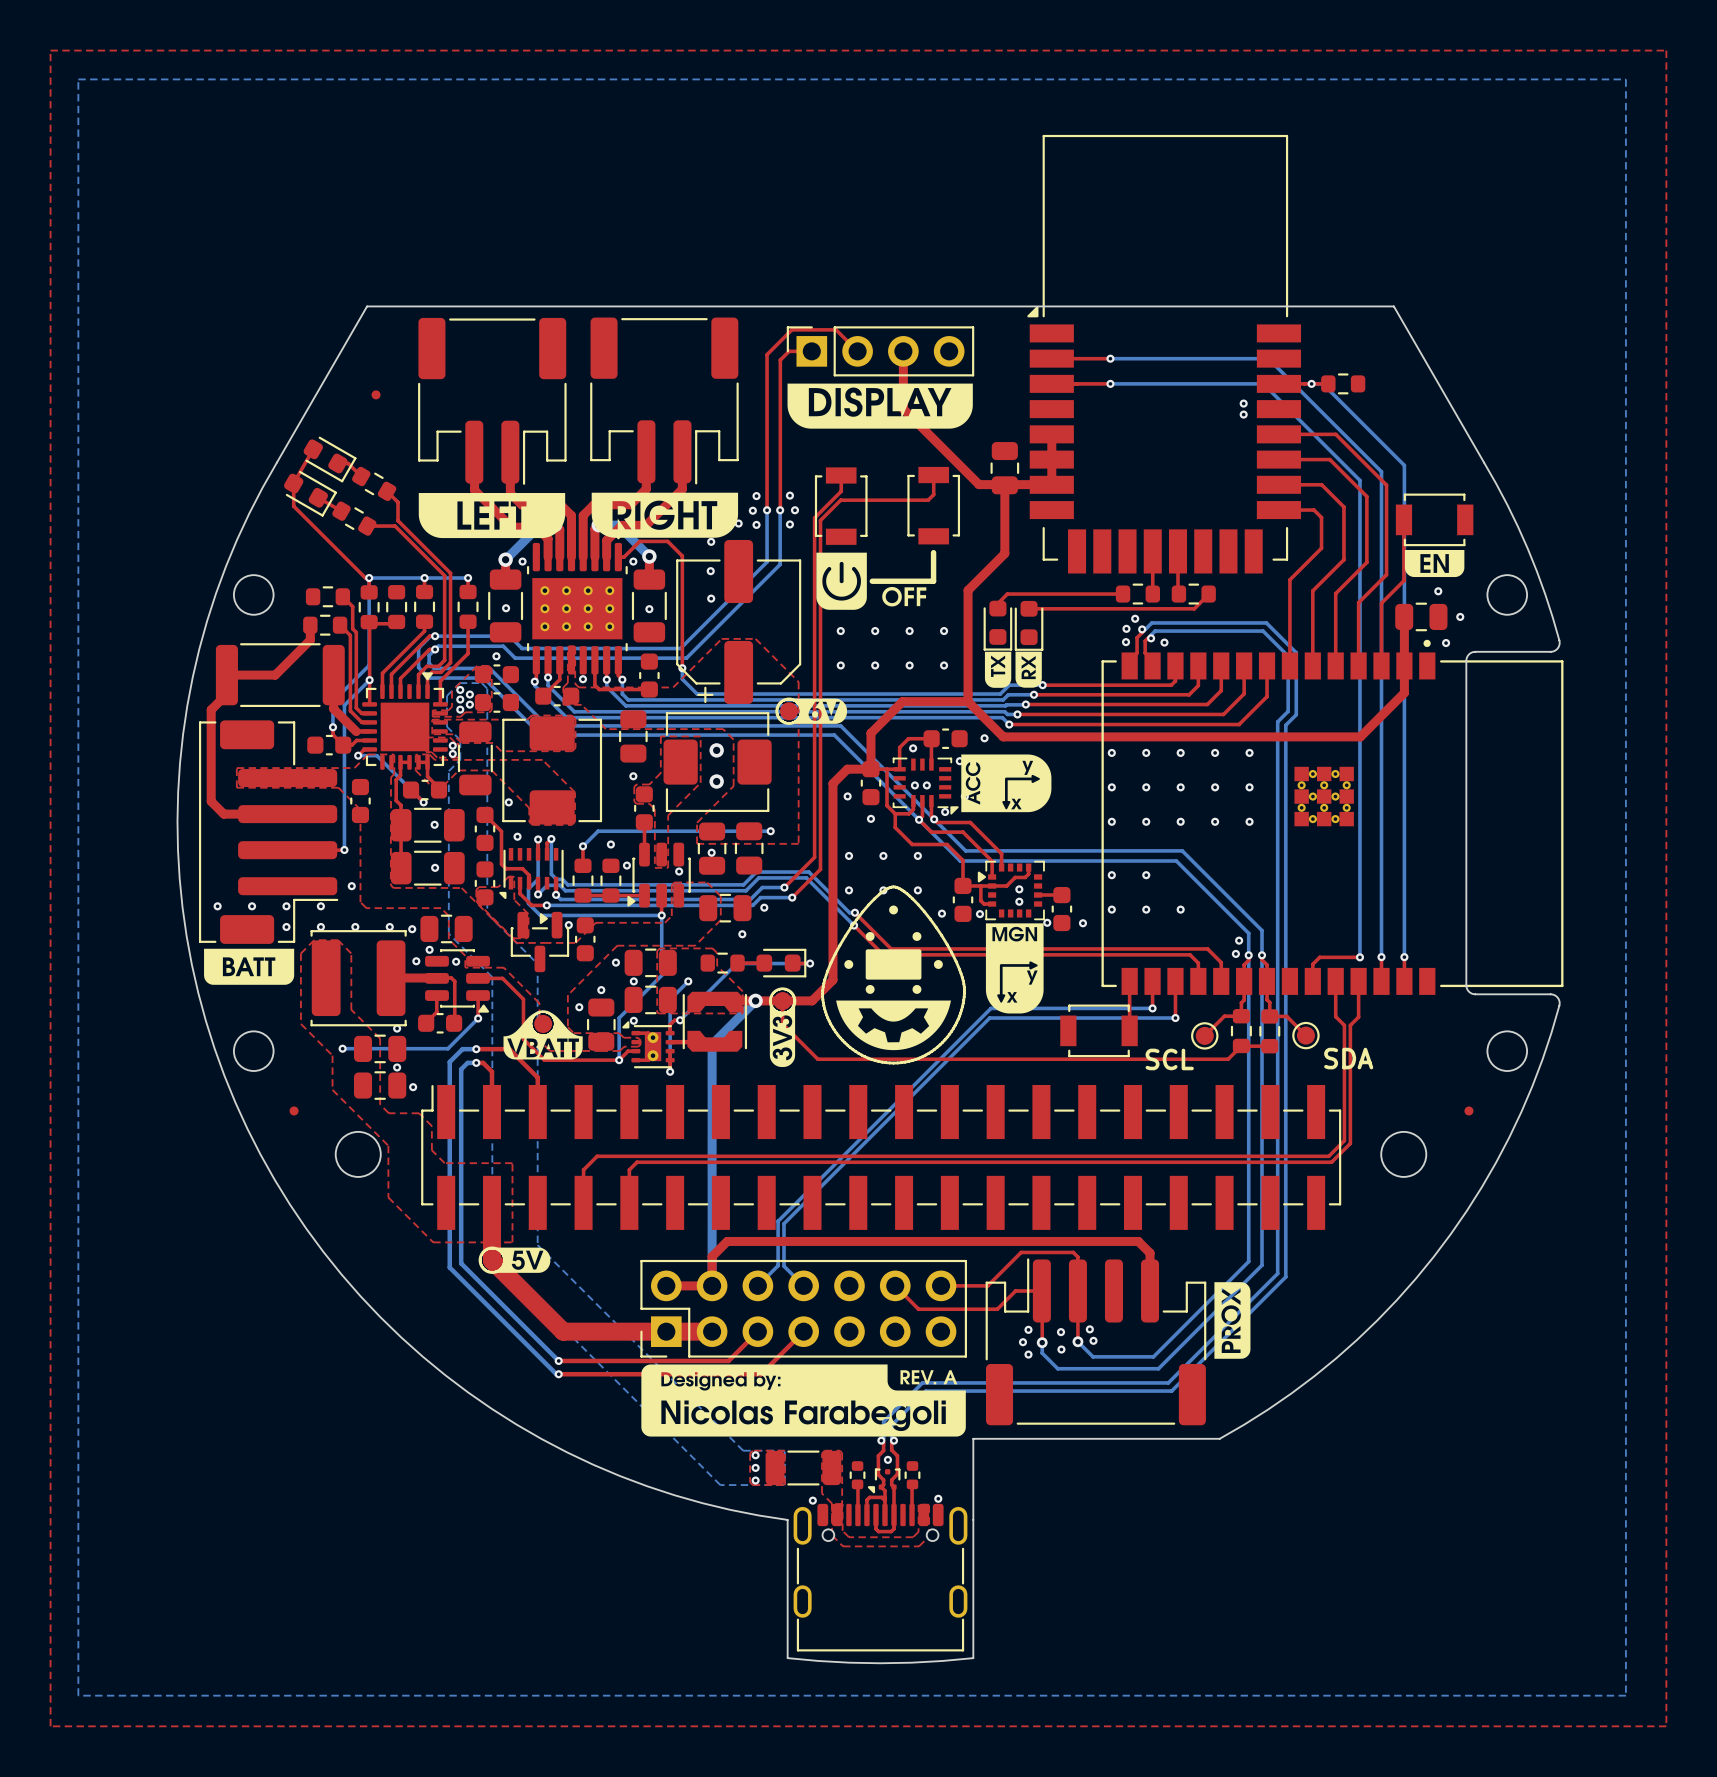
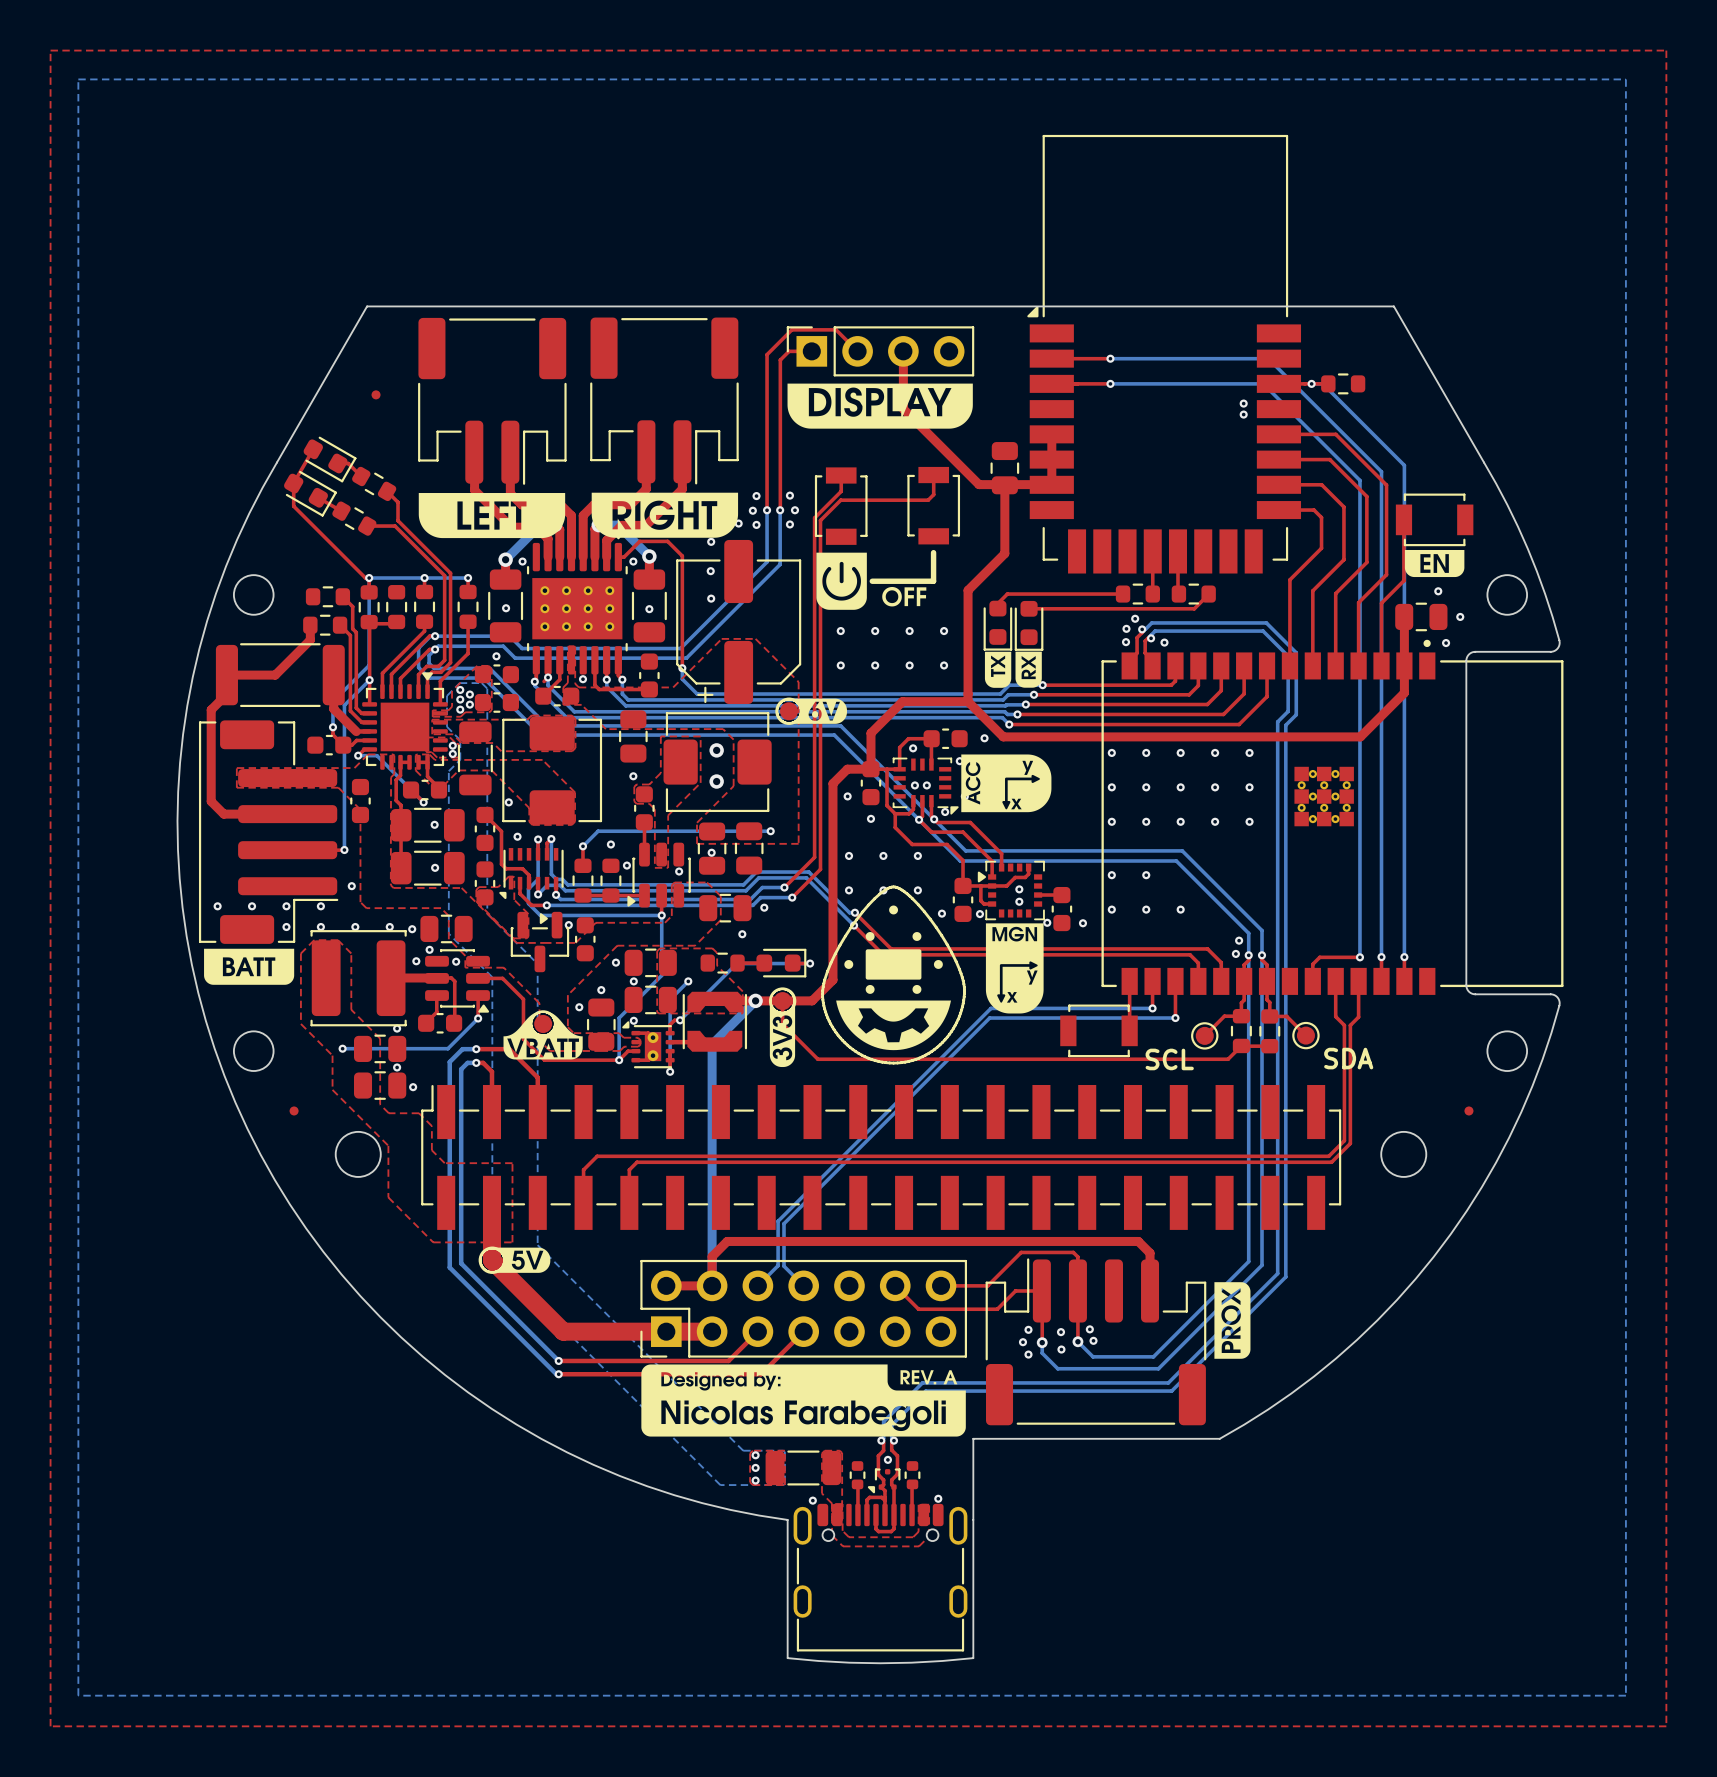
top track: none -> (548, 677) (544, 681)

